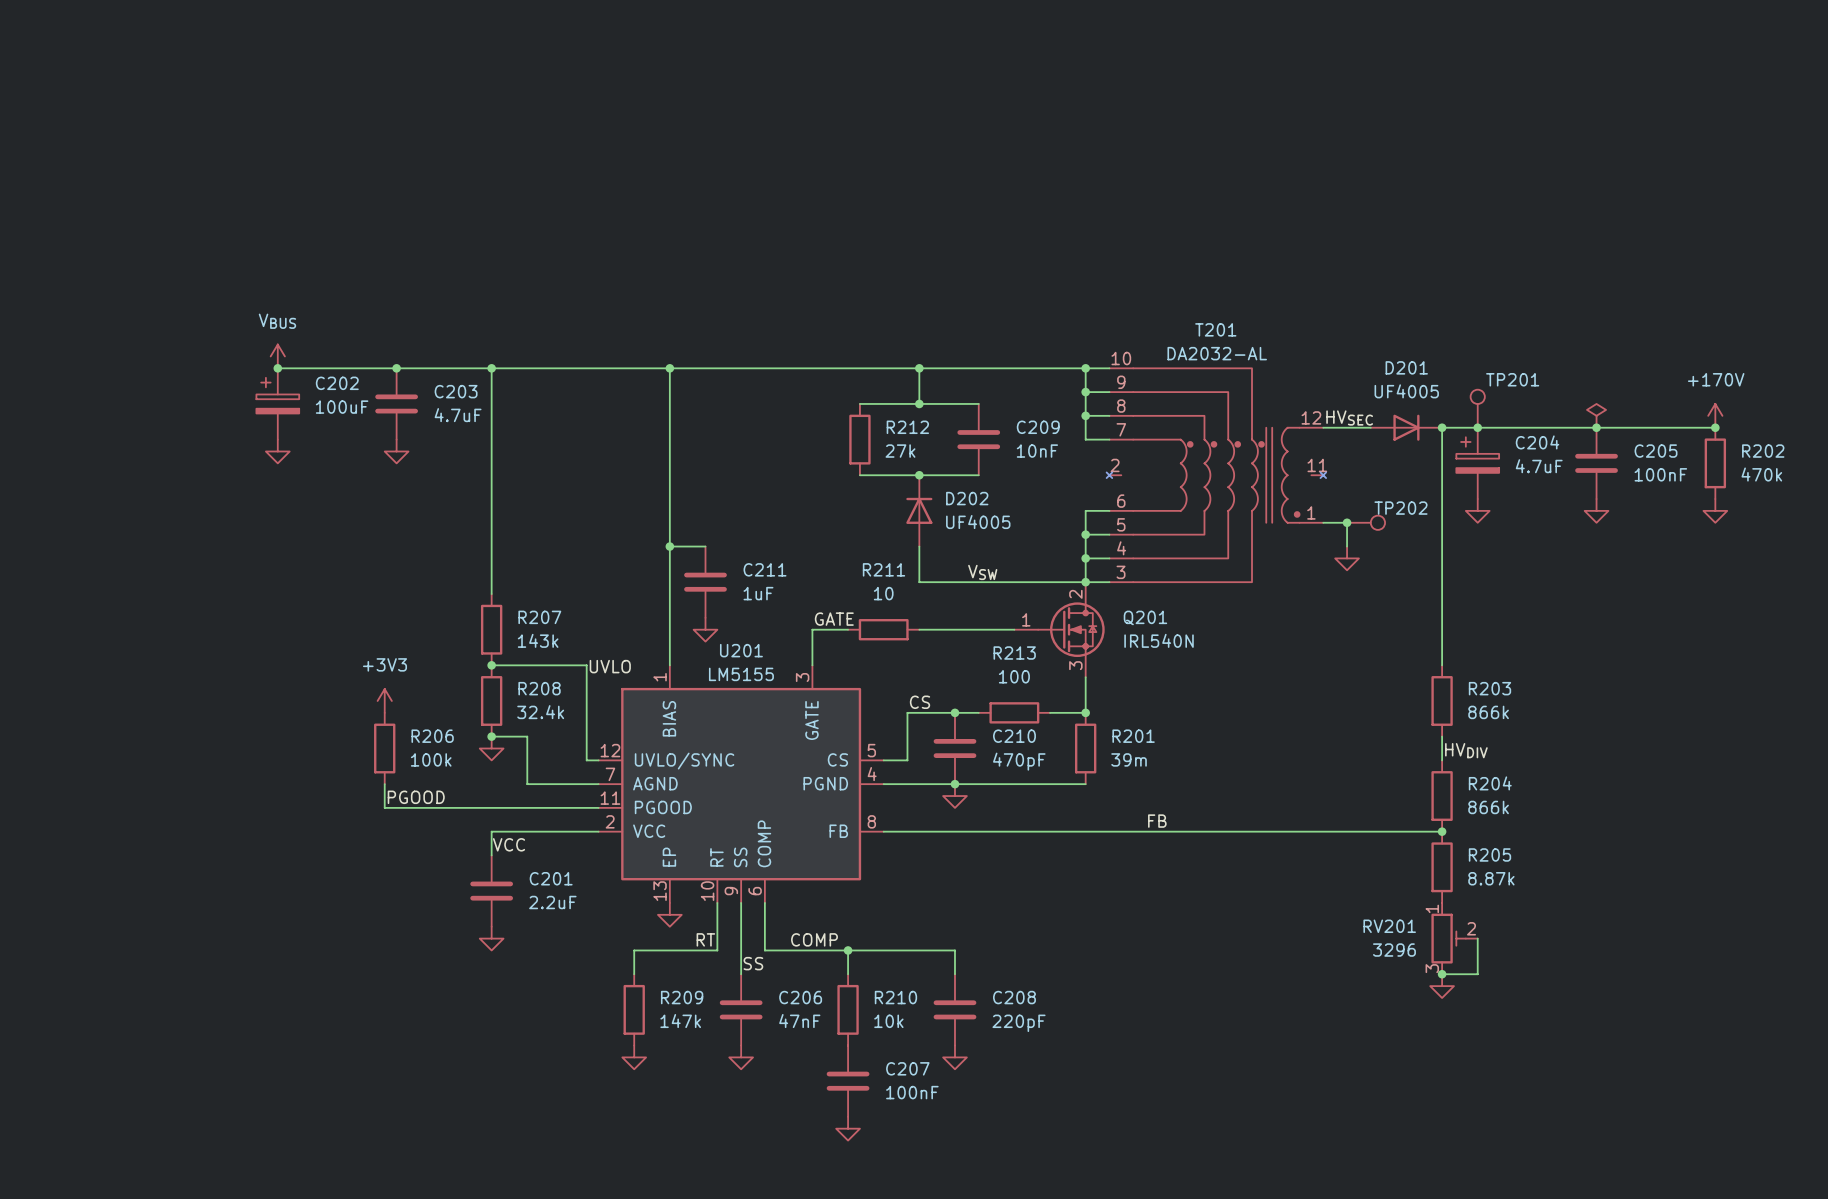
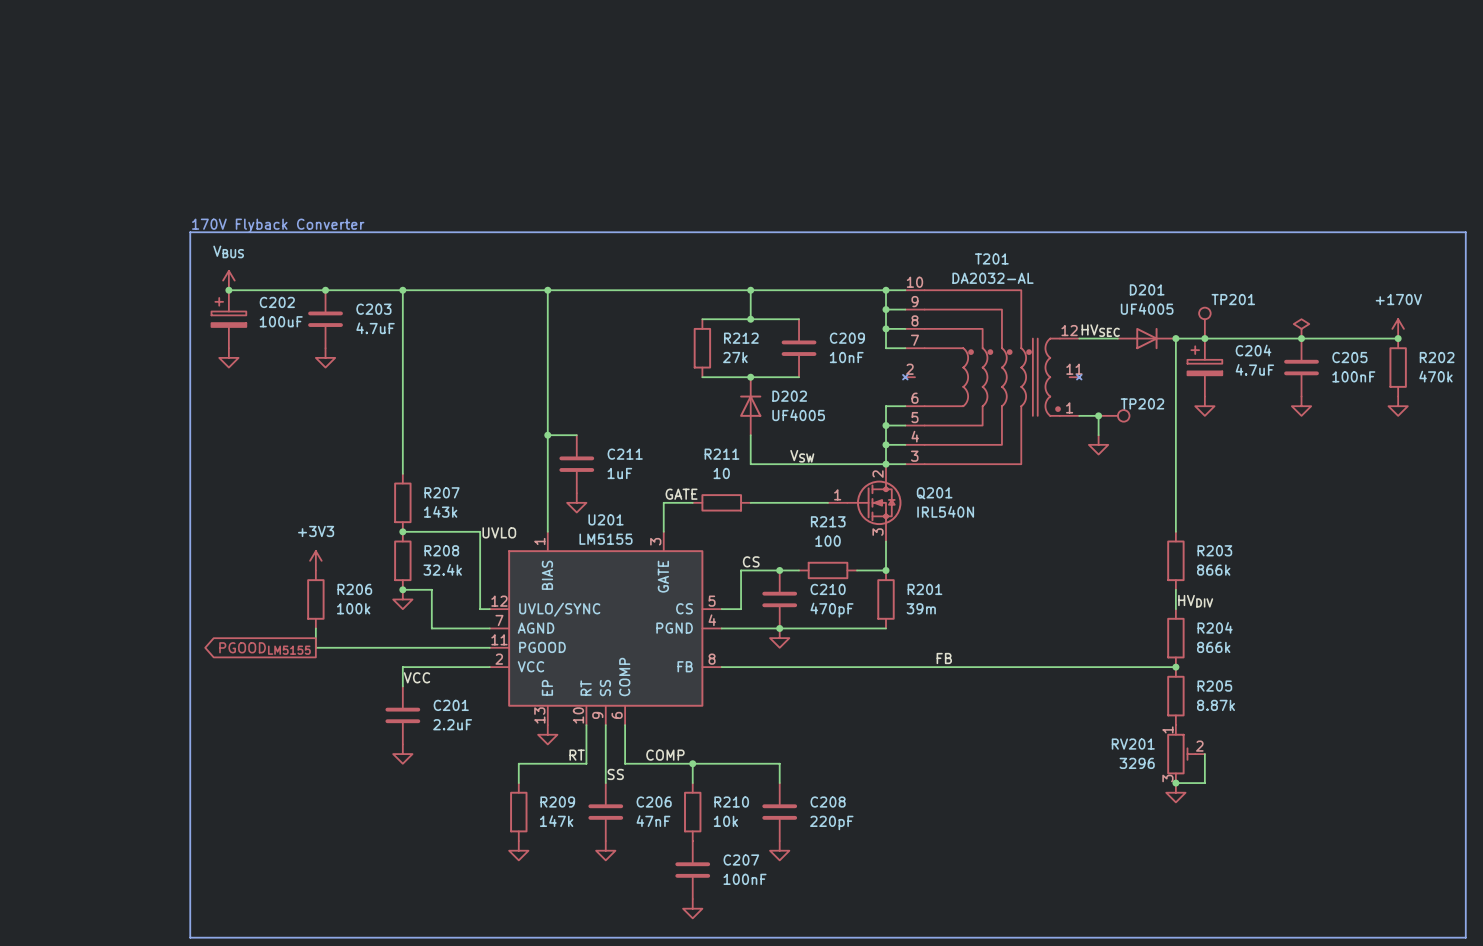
text: none -> 170V Flyback Converter (278, 225)
line: none -> (190, 232) (1465, 232) (1465, 937) (190, 937) (190, 232)
label: PGOOD (416, 797) -> none
global label: none -> PGOODLM5155 (265, 648)

